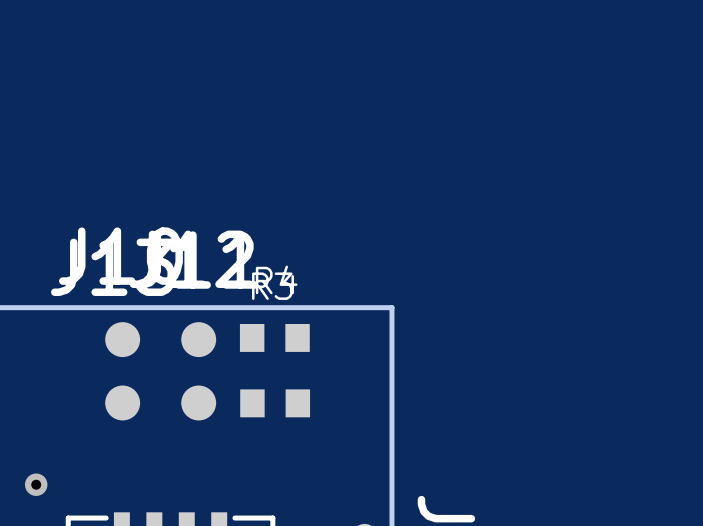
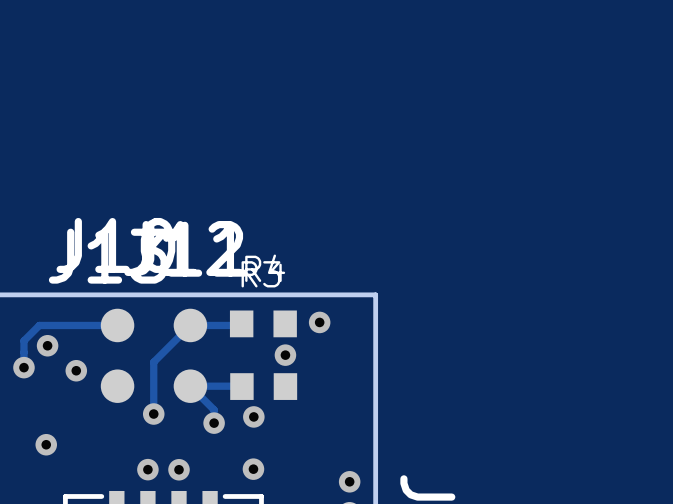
via: none -> (319, 322)
track: none -> (241, 323) (239, 325) (190, 325) (153, 362) (153, 414)
track: none -> (117, 325) (39, 325) (23, 340) (23, 367)
via: none -> (47, 345)
via: none -> (285, 355)
via: none -> (23, 367)
via: none -> (76, 370)
track: none -> (241, 386) (190, 386) (214, 409) (214, 423)
via: none -> (153, 414)
via: none -> (253, 416)
via: none -> (214, 423)
via position: (36, 484) -> (46, 444)
via: none -> (253, 469)
via: none -> (147, 469)
via: none -> (179, 469)
via: none -> (349, 481)

